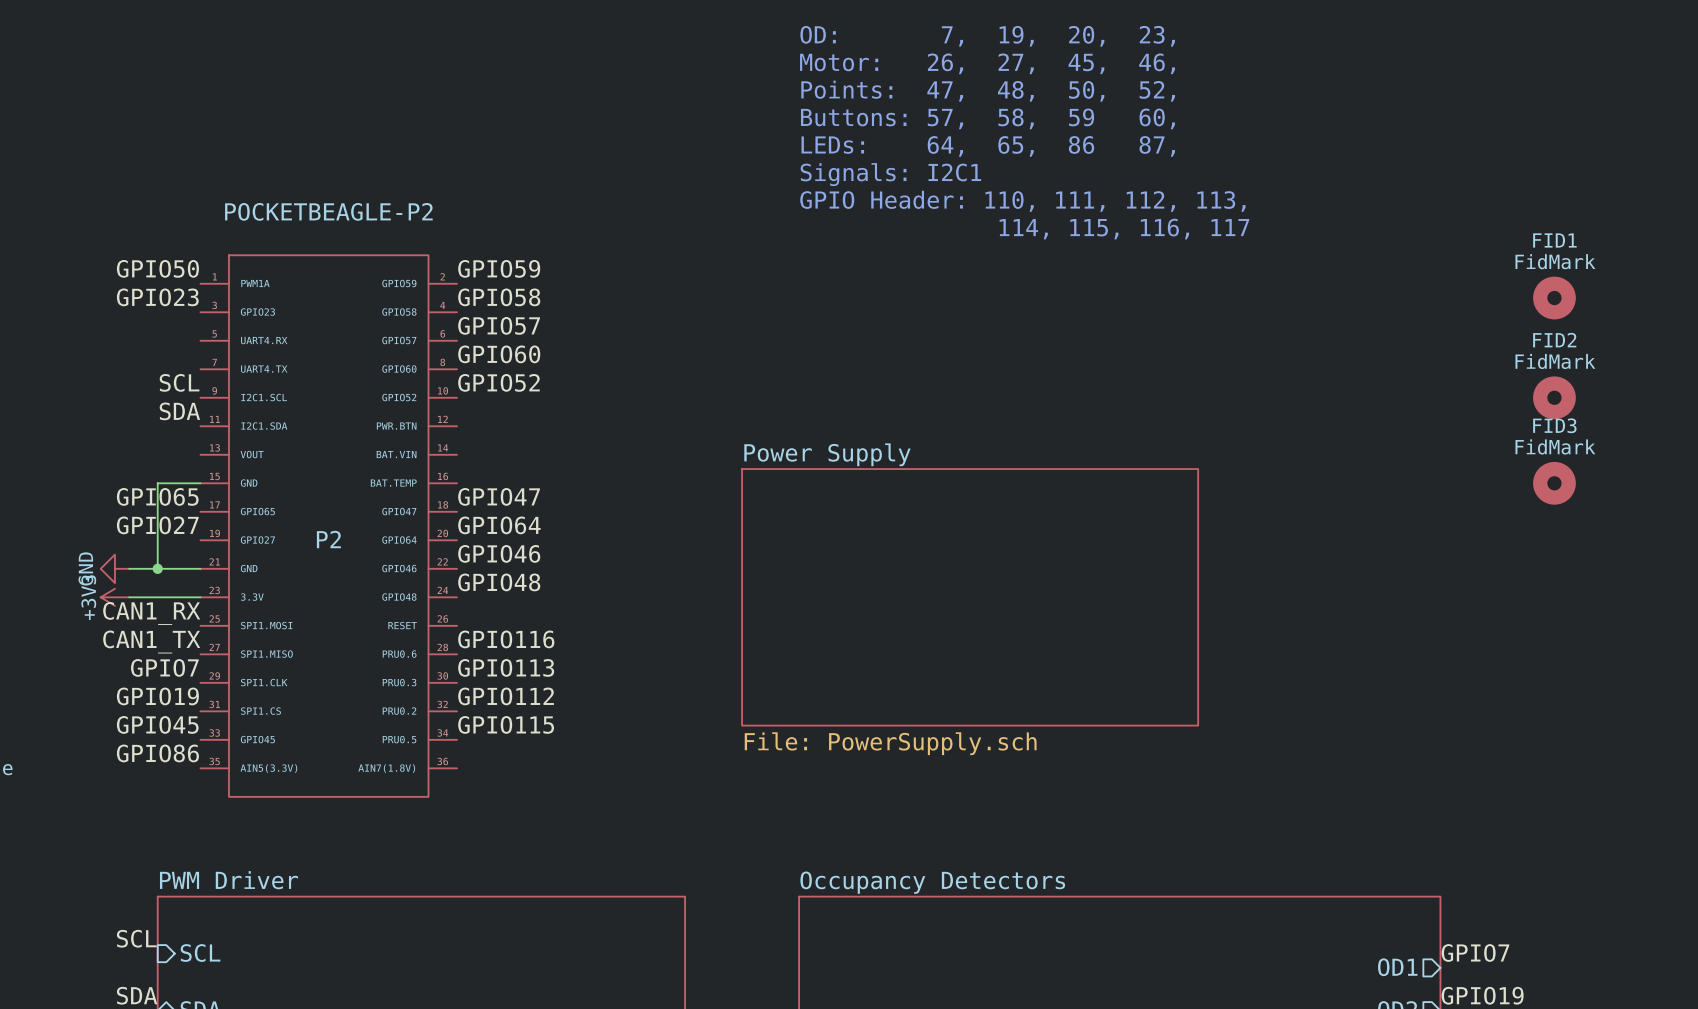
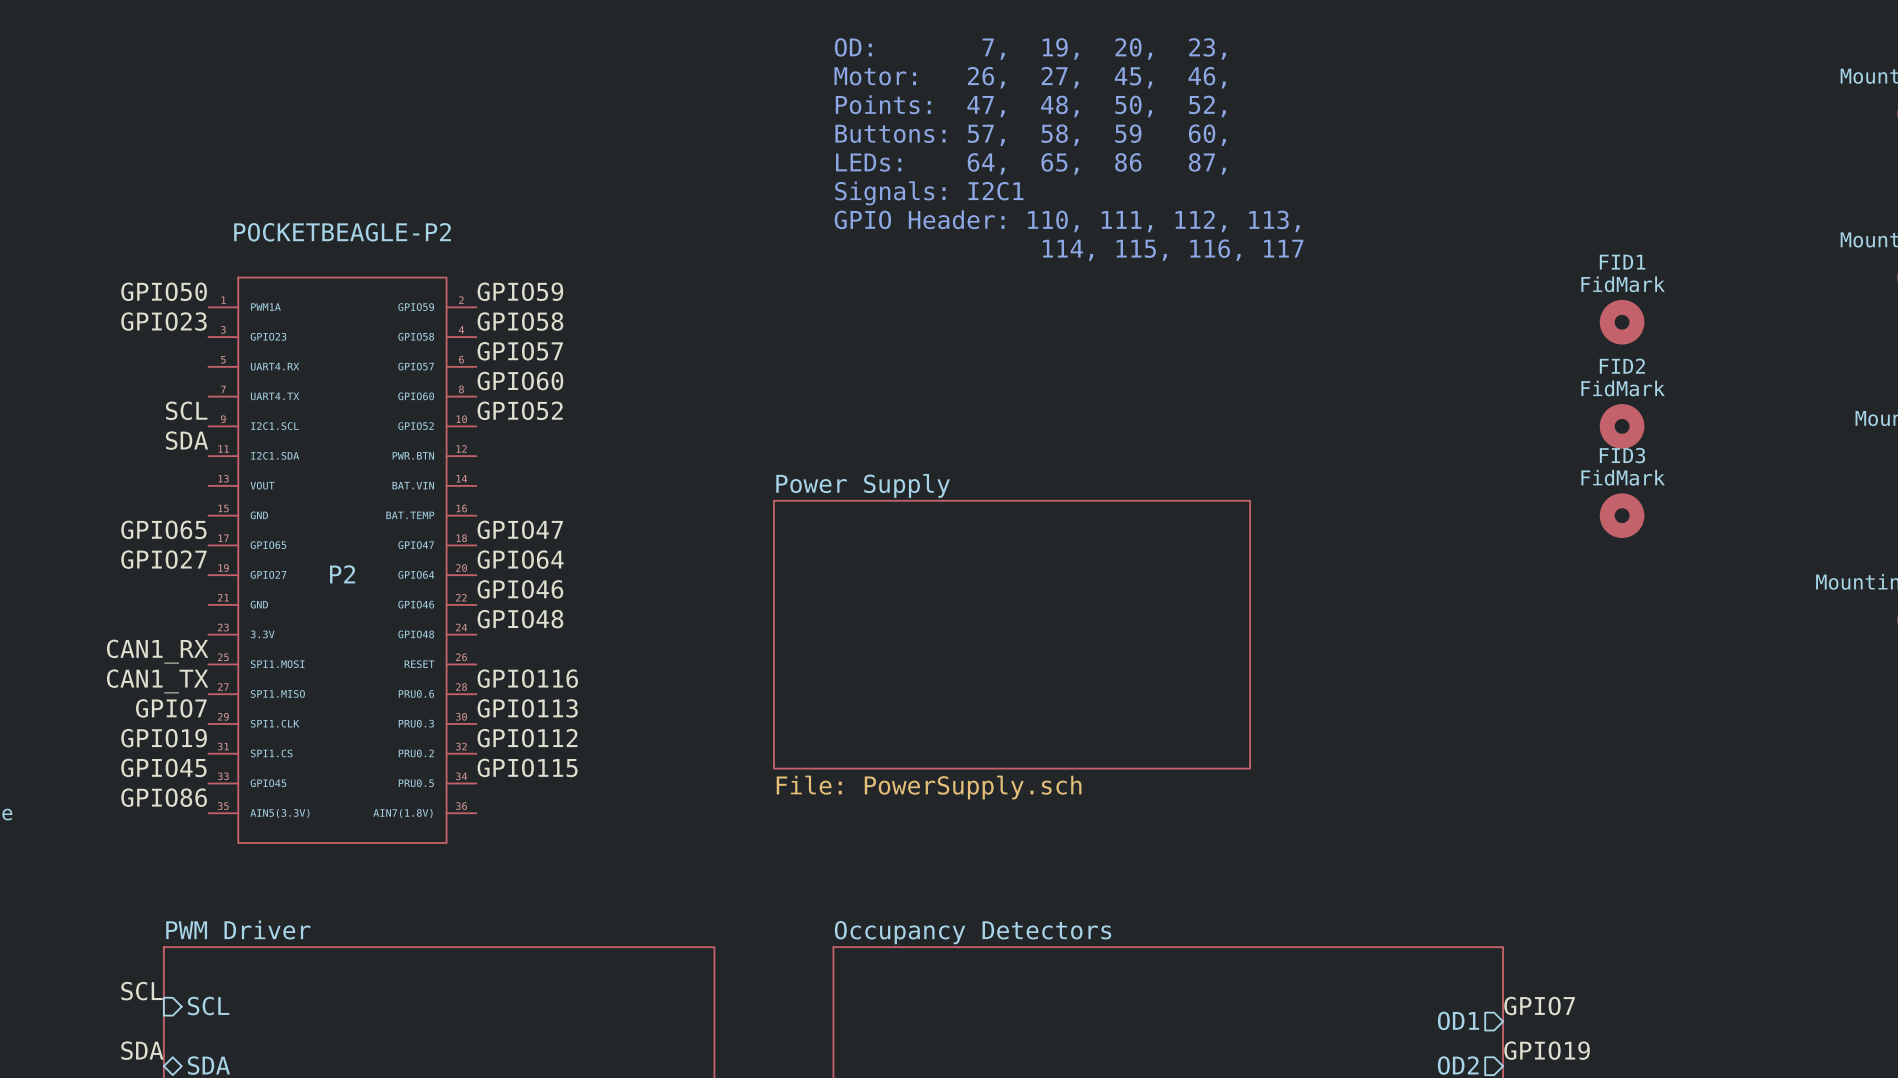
wire: (200, 483) (157, 483) (157, 568) -> none
power symbol: GND (114, 568) -> none
wire: (129, 568) (200, 568) -> none
junction: (157, 568) -> none
power symbol: +3V3 (114, 597) -> none
wire: (129, 597) (200, 597) -> none

